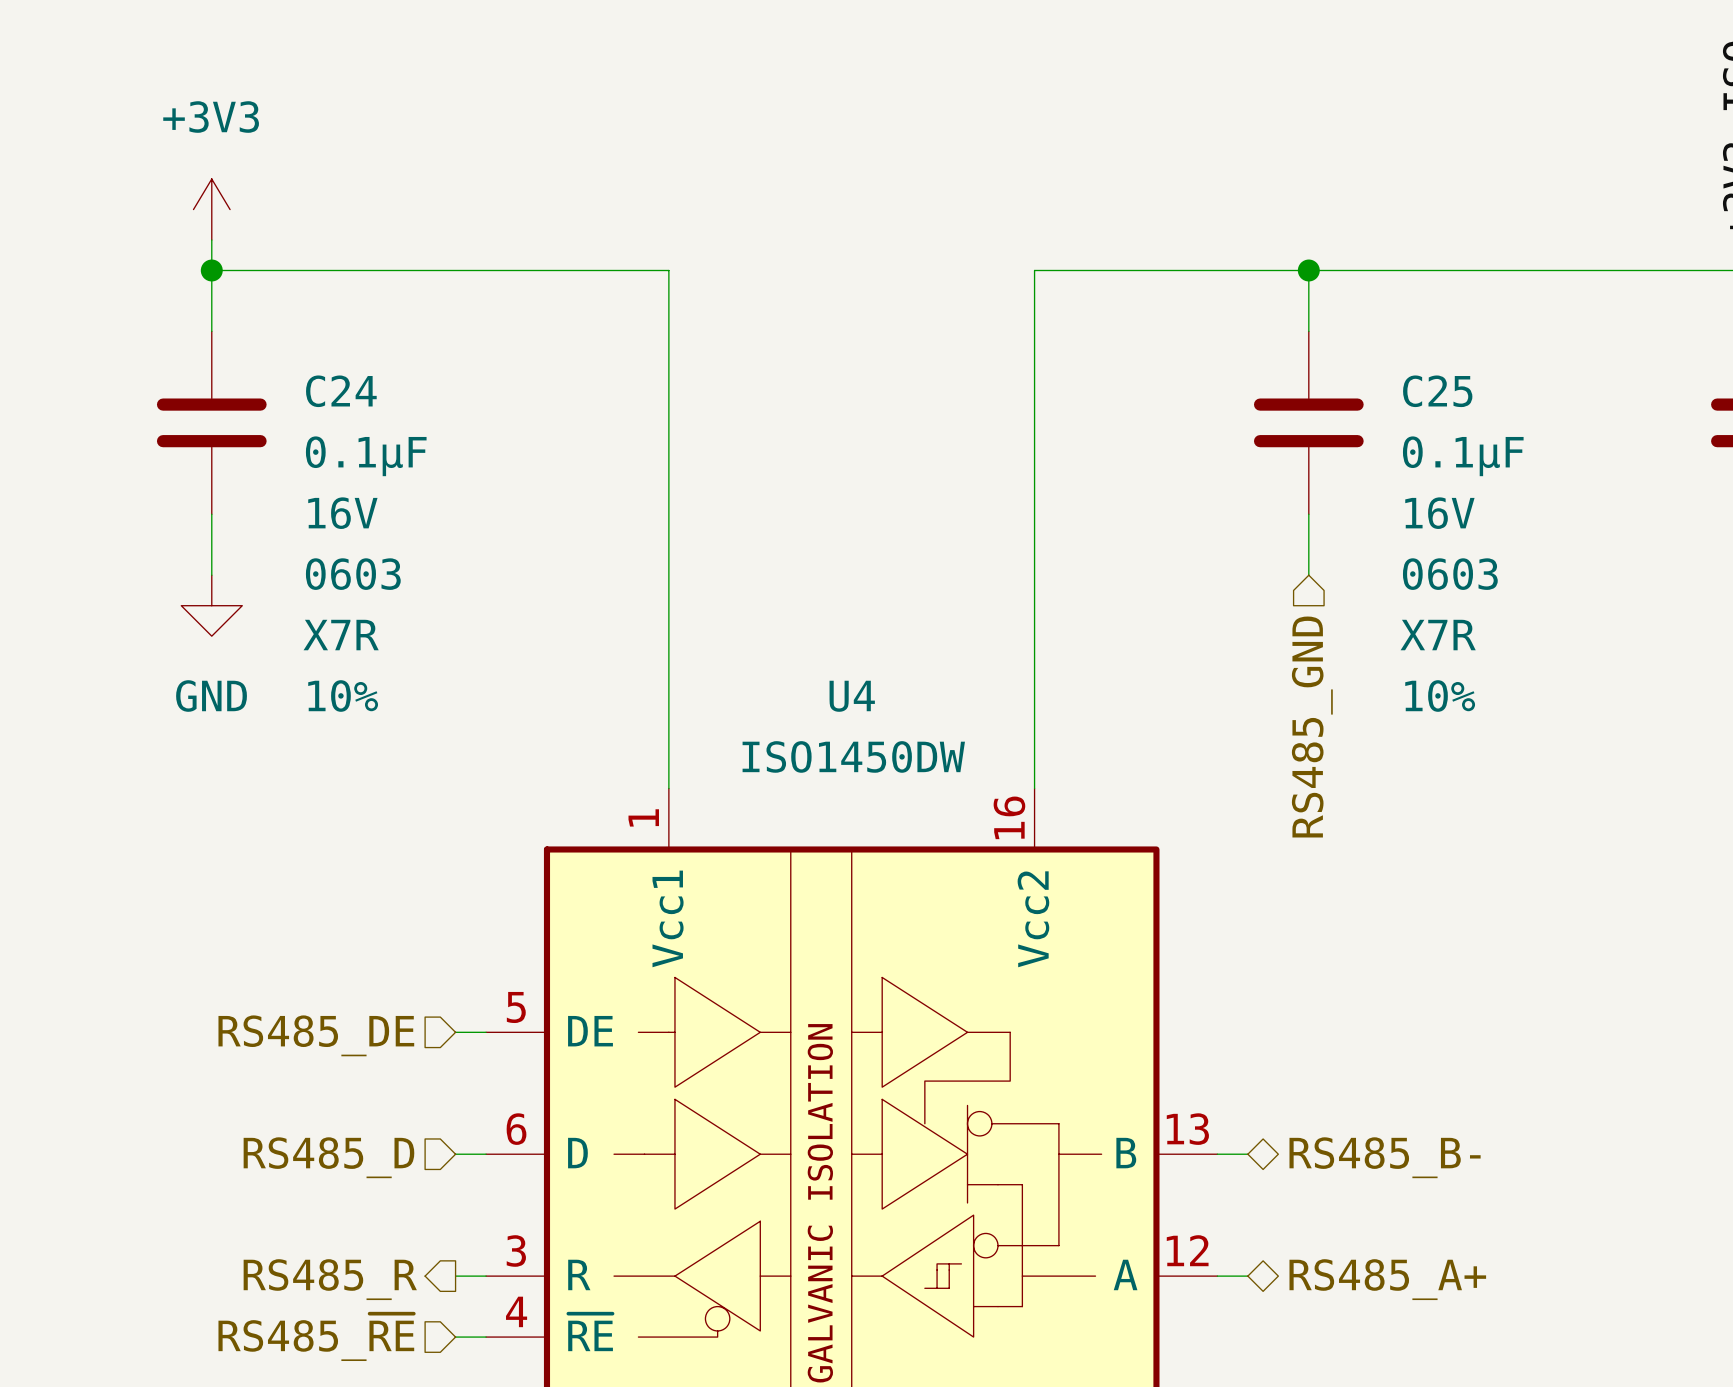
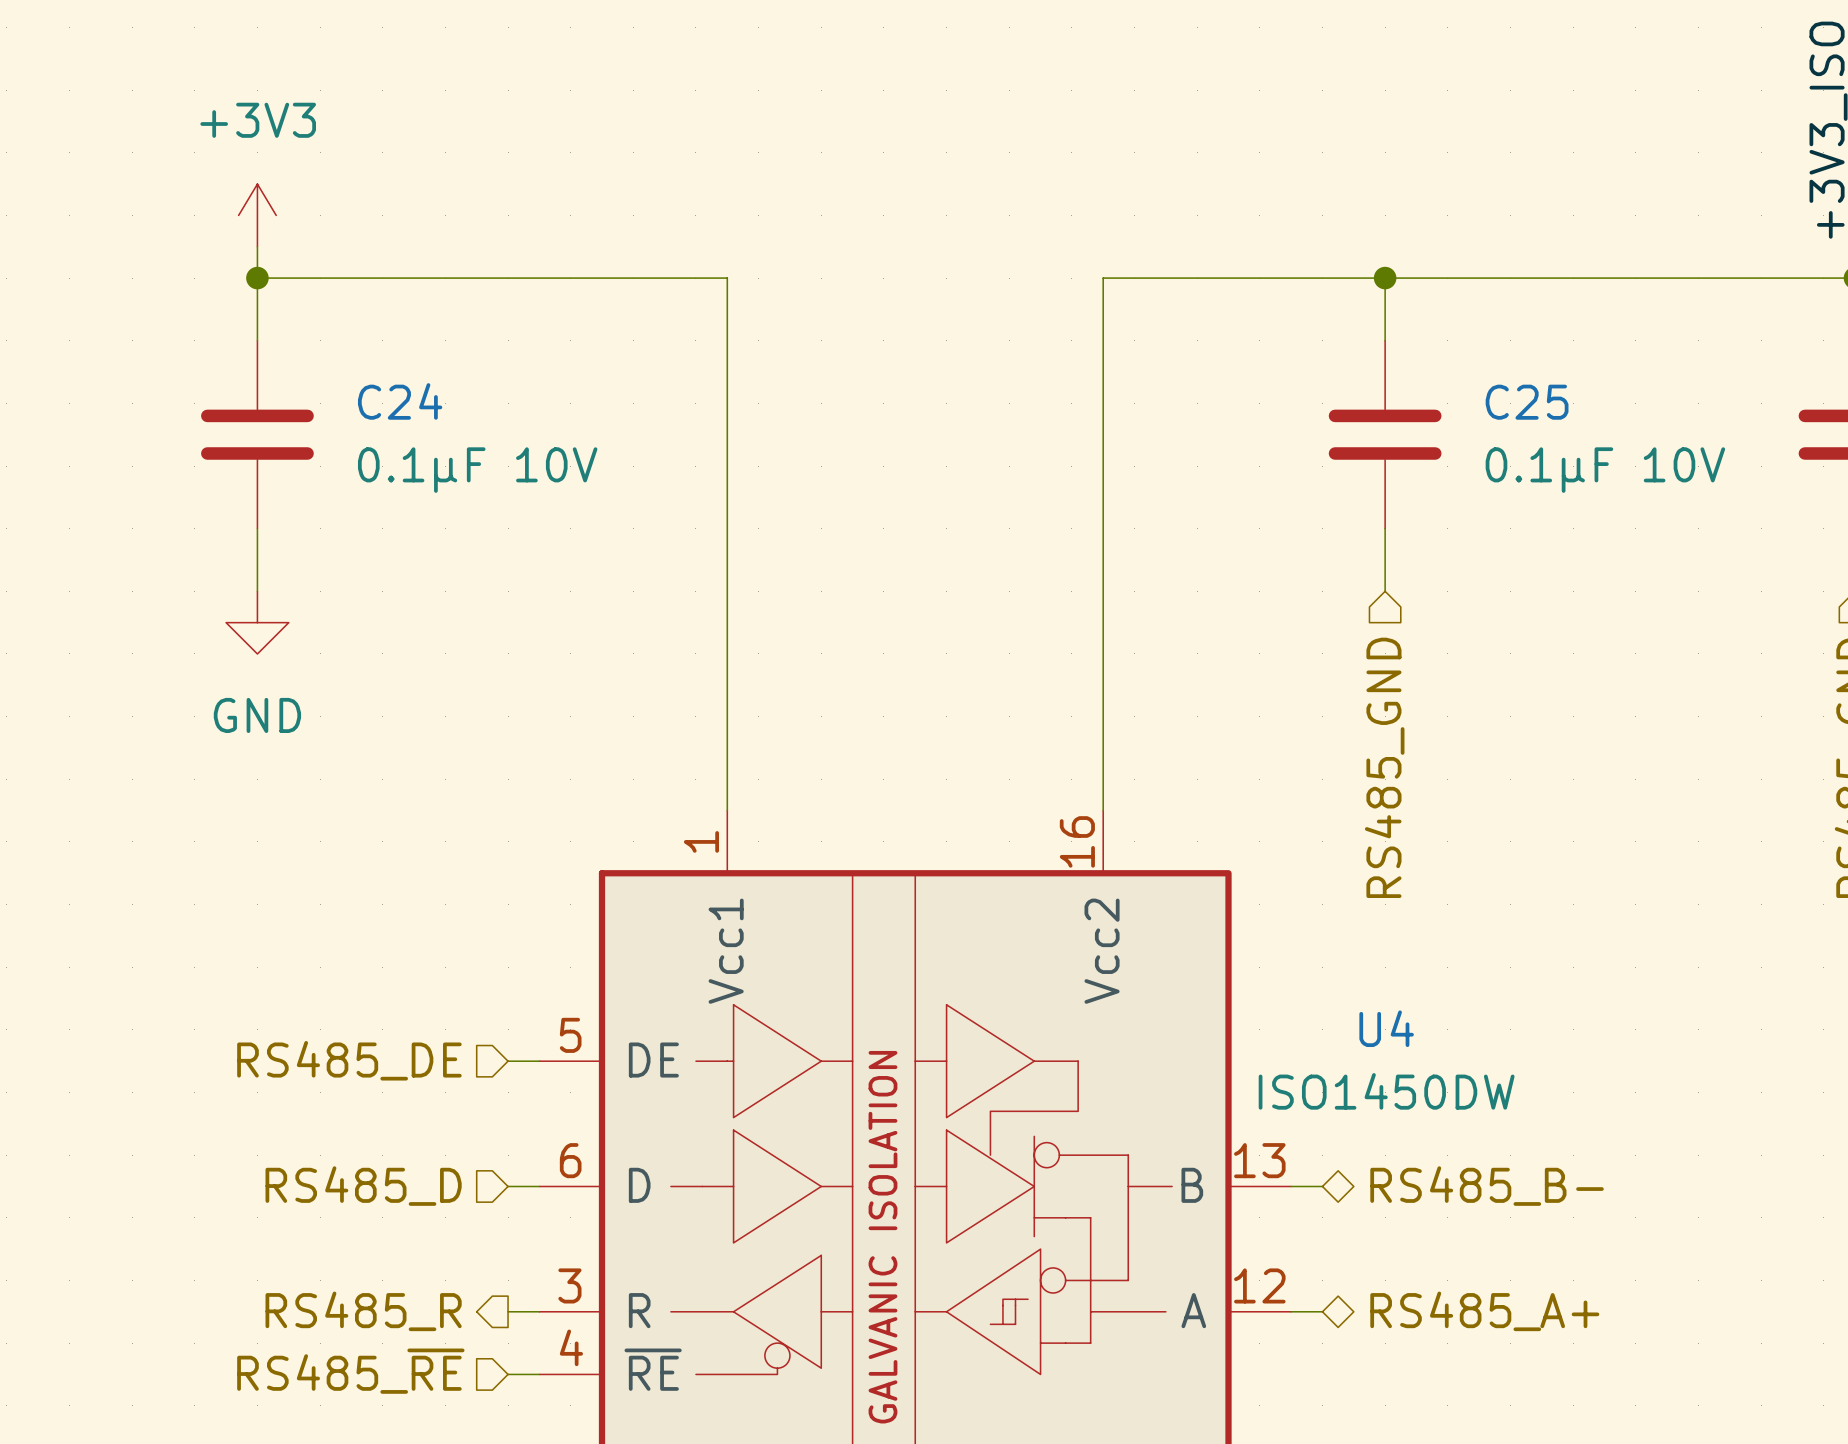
C24 value: 0.1µF (366, 456) -> 0.1µF 10V (477, 470)
C25 value: 0.1µF (1463, 456) -> 0.1µF 10V (1605, 470)
C24 text: 16V (342, 513) -> none
C25 text: 16V (1439, 513) -> none
C24 text: 0603 (353, 574) -> none
C25 text: 0603 (1450, 574) -> none
C24 text: X7R (341, 635) -> none
C25 text: X7R (1438, 635) -> none
C24 text: 10% (343, 696) -> none
U4 name position: U4 (852, 696) -> U4 (1386, 1028)
C25 text: 10% (1440, 696) -> none
U4 value position: ISO1450DW (853, 756) -> ISO1450DW (1386, 1091)

